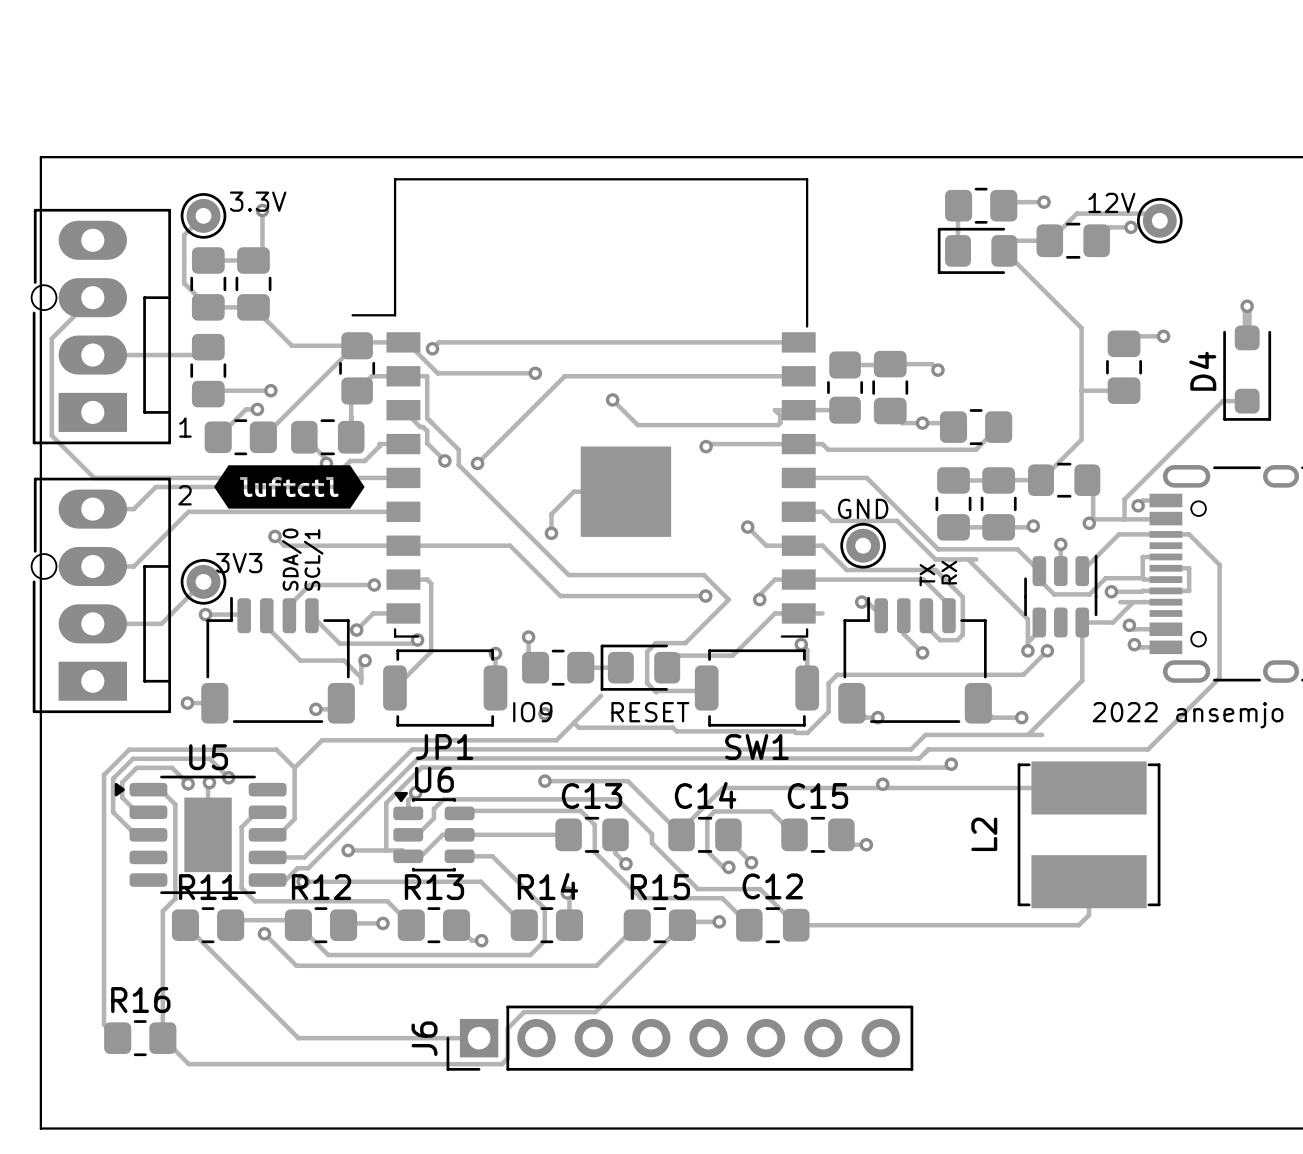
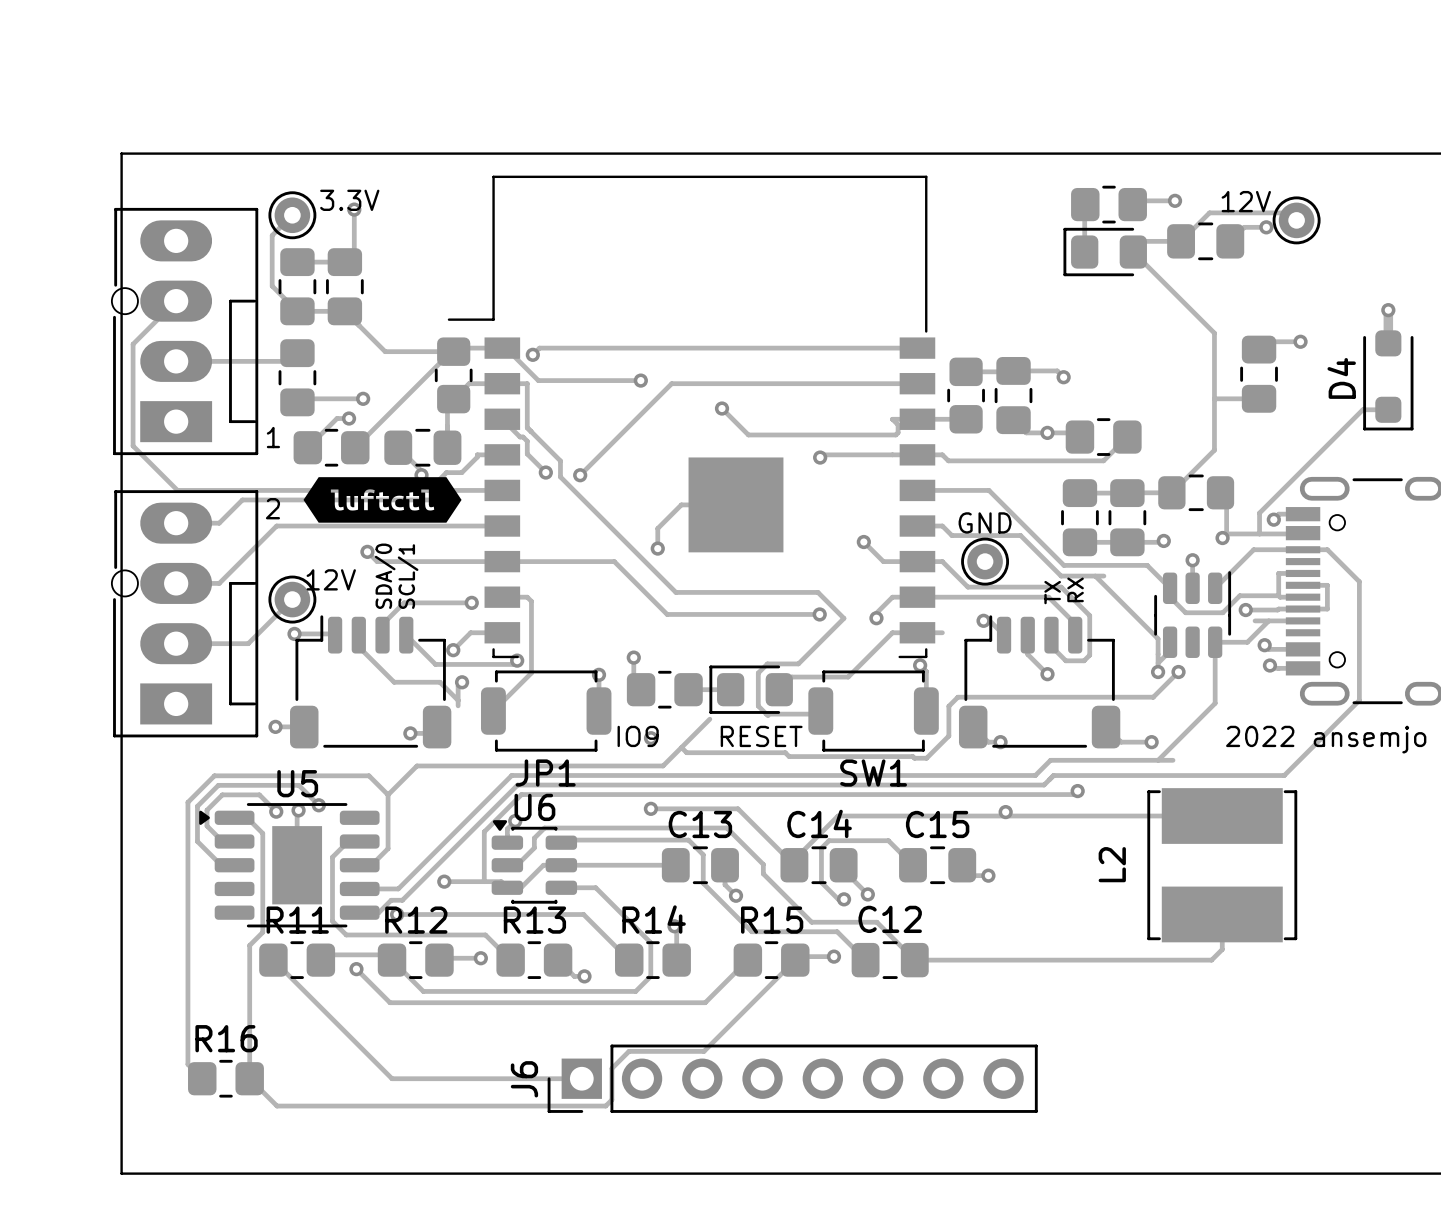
text: 3V3 (239, 563) -> 12V (331, 579)

